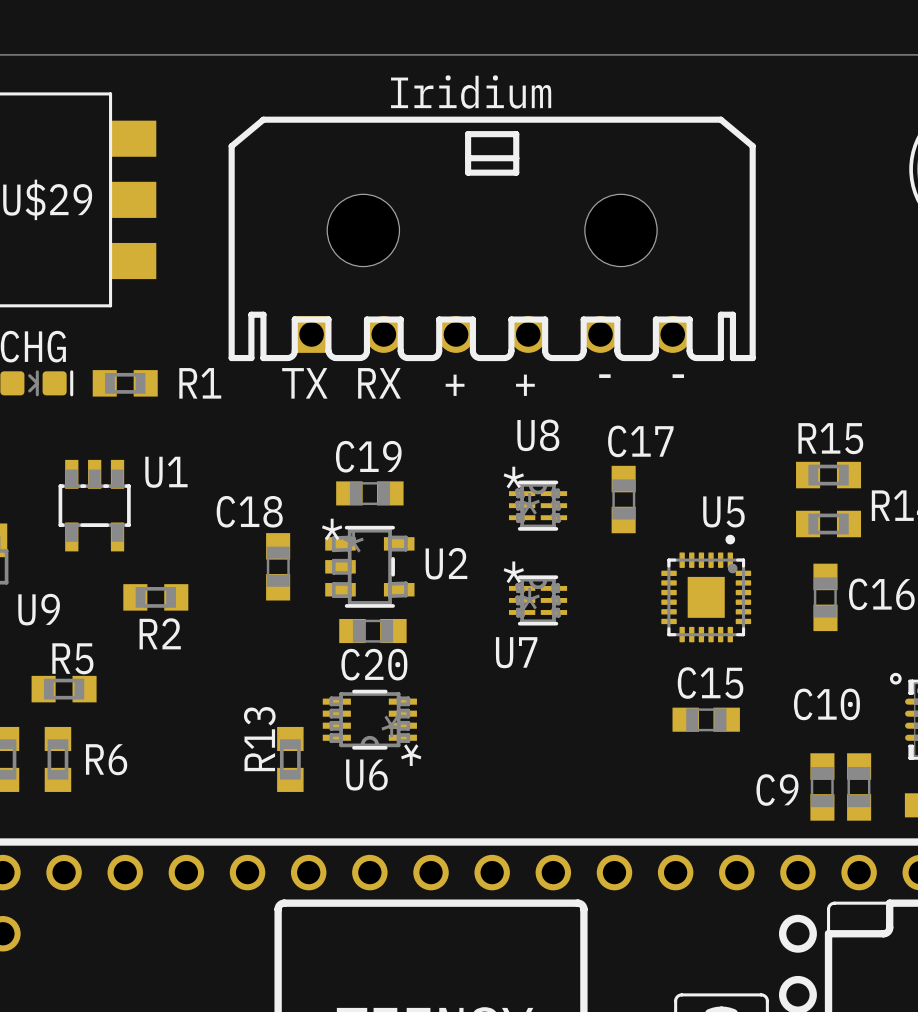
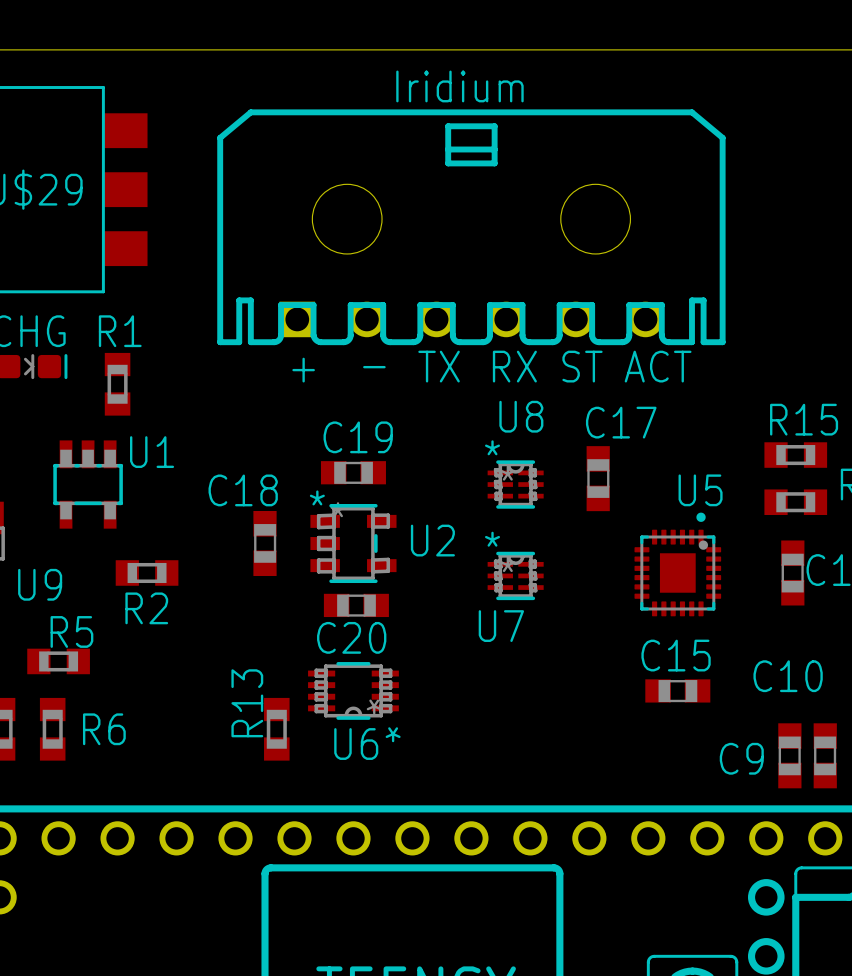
text: - (604, 376) -> ST (582, 366)
text: - (678, 376) -> ACT (658, 366)
R1 rotation: 0° (125, 383) -> 90° clockwise (117, 384)
R1 name position: R1 (200, 383) -> R1 (120, 331)
text: TX (304, 383) -> + (303, 370)
text: RX (379, 383) -> - (374, 367)
text: + (455, 385) -> TX (439, 366)
text: + (525, 385) -> RX (514, 366)

